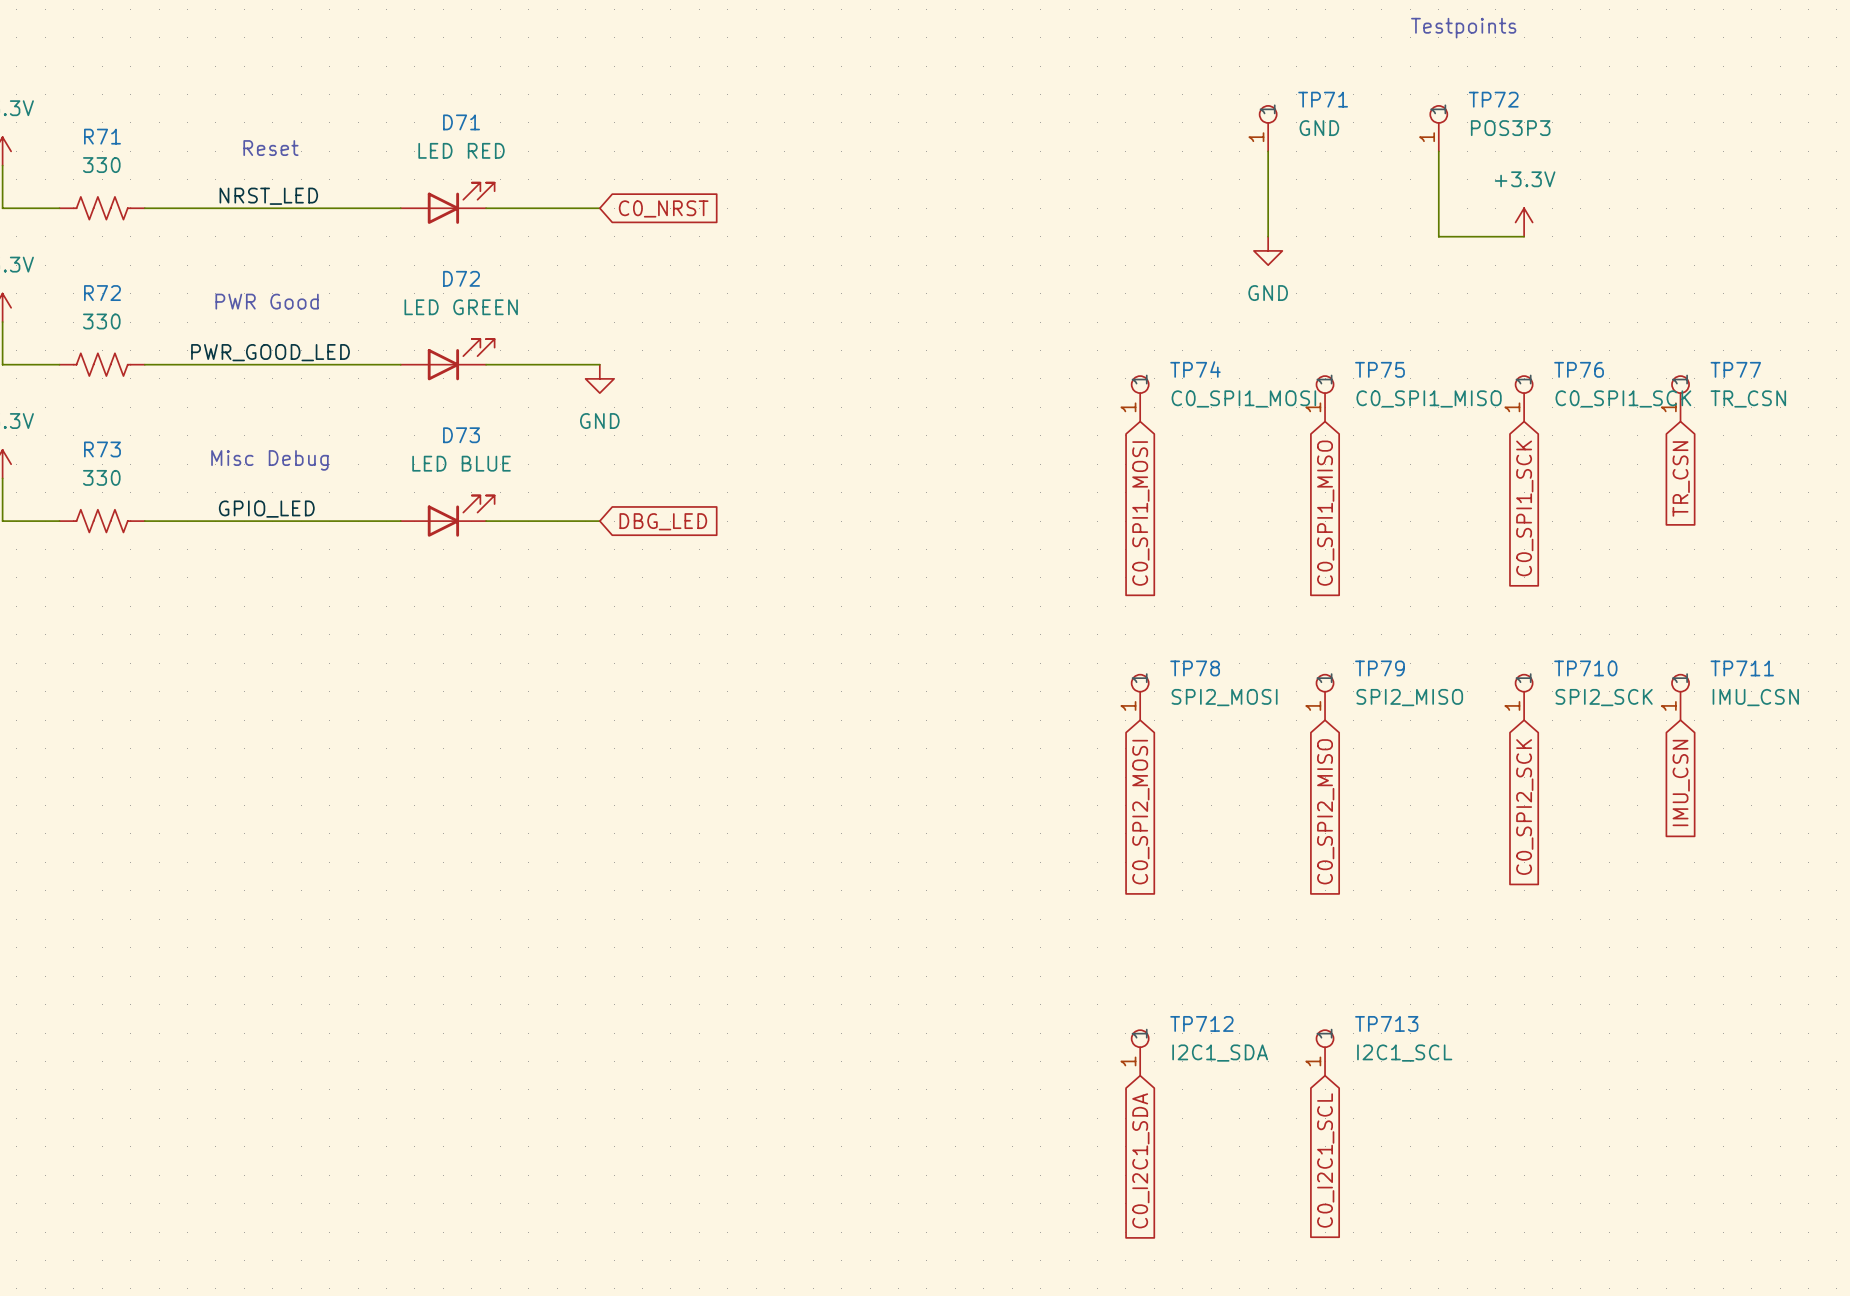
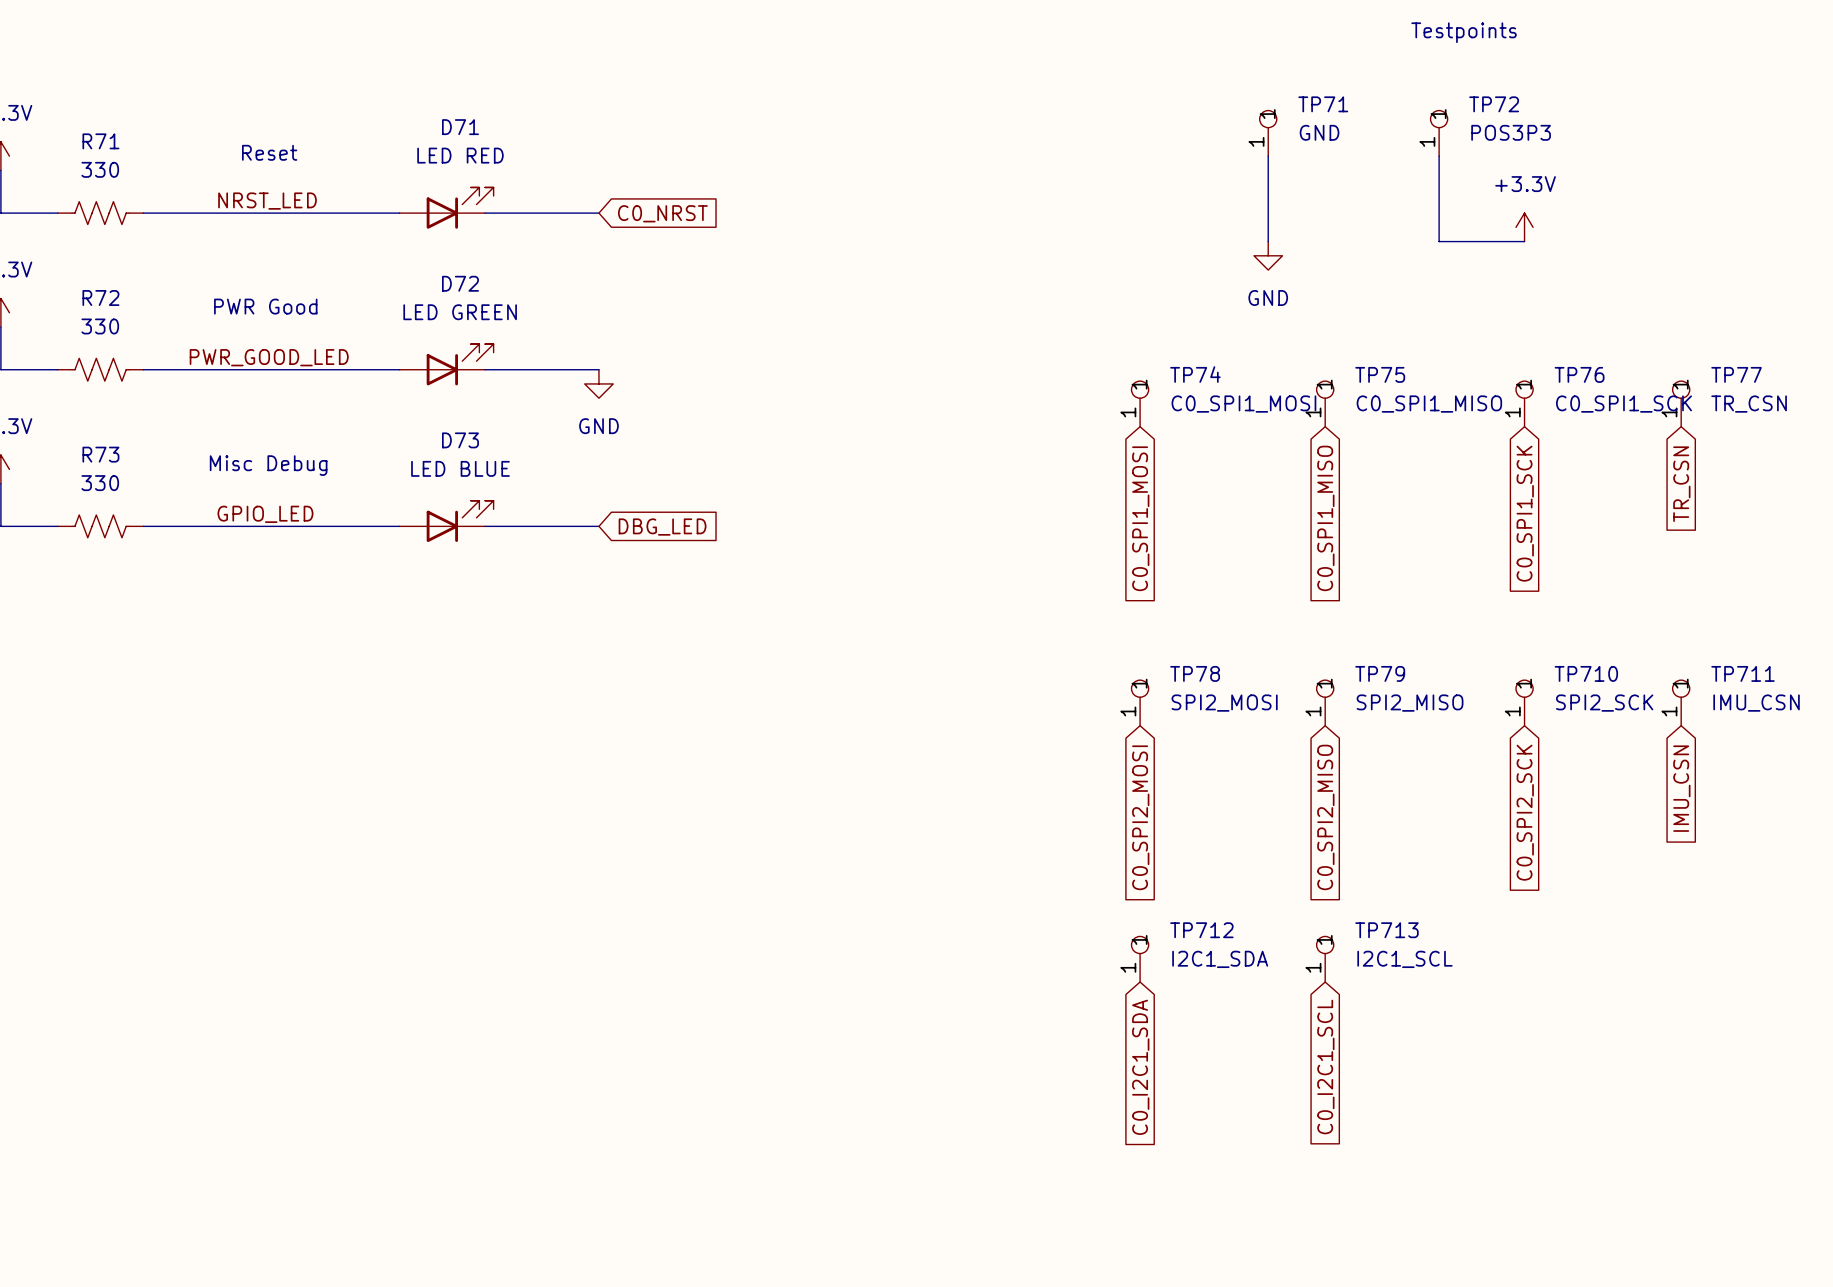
TP712 position: (1140, 1052) -> (1140, 959)
TP713 position: (1325, 1052) -> (1325, 959)
global label position: C0_I2C1_SDA (1140, 1160) -> C0_I2C1_SDA (1140, 1067)
global label position: C0_I2C1_SCL (1325, 1160) -> C0_I2C1_SCL (1325, 1066)

